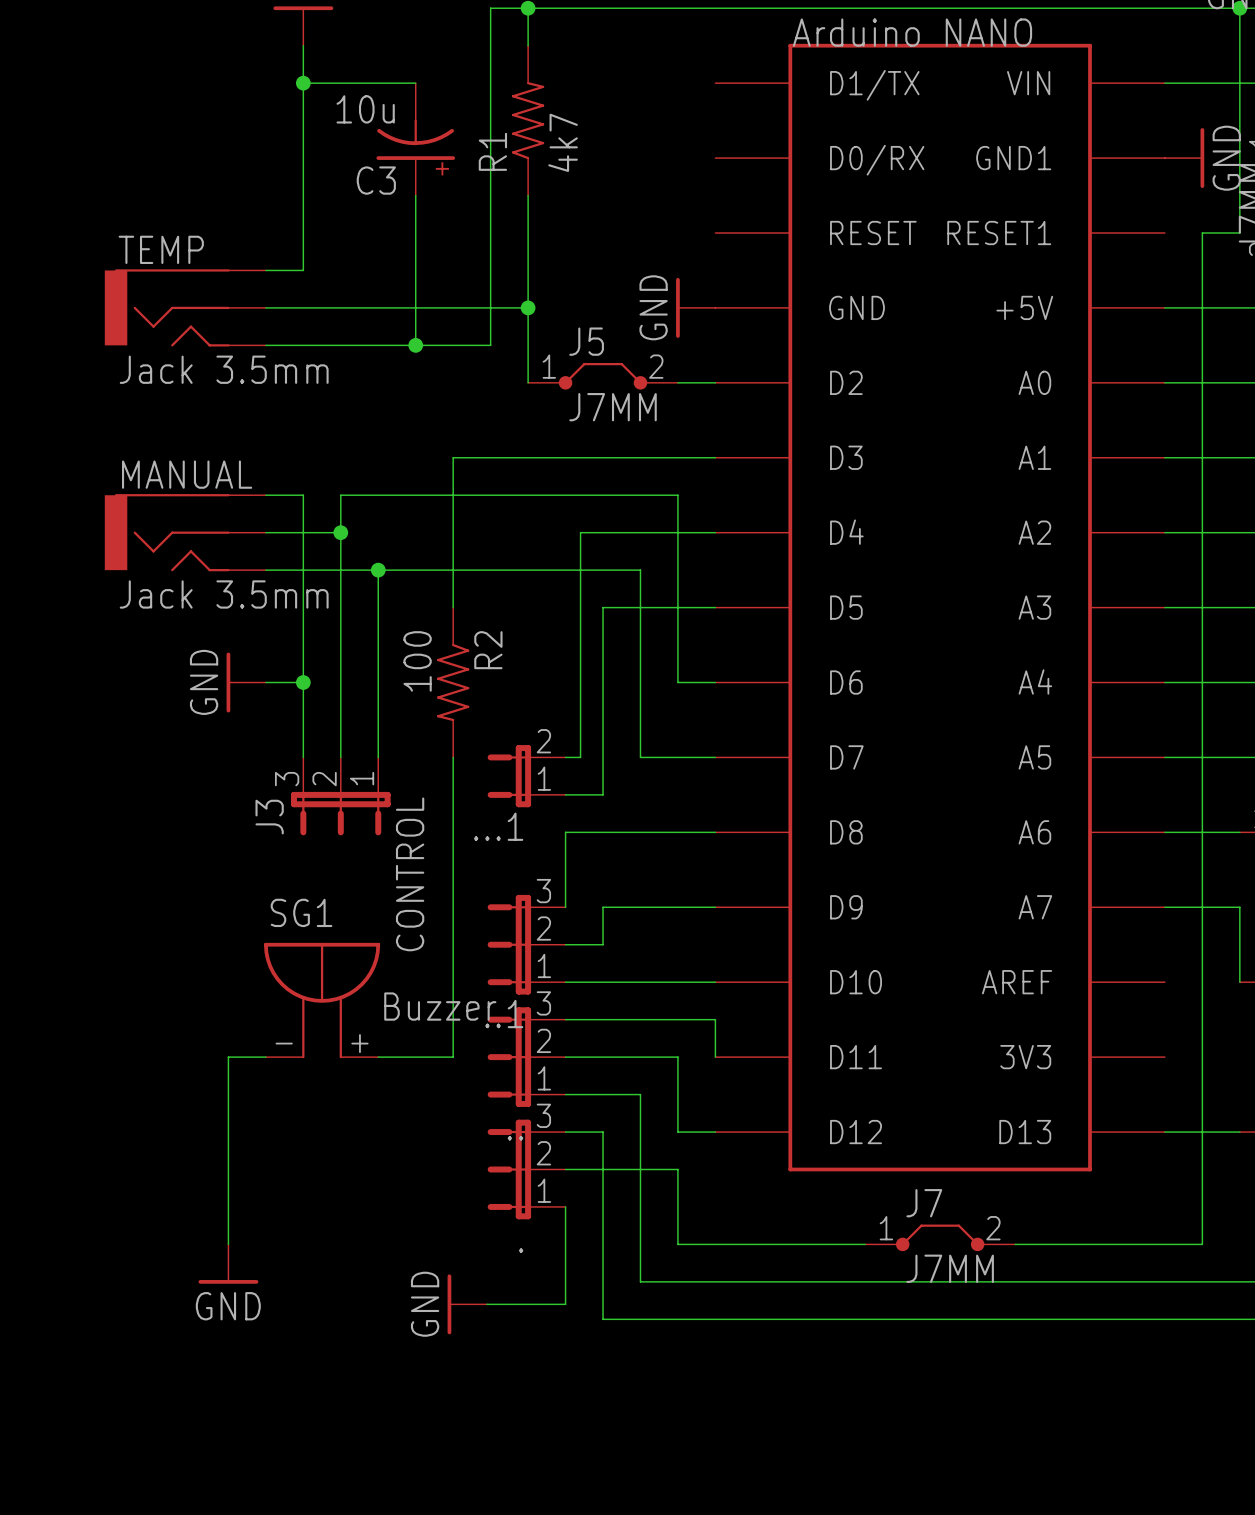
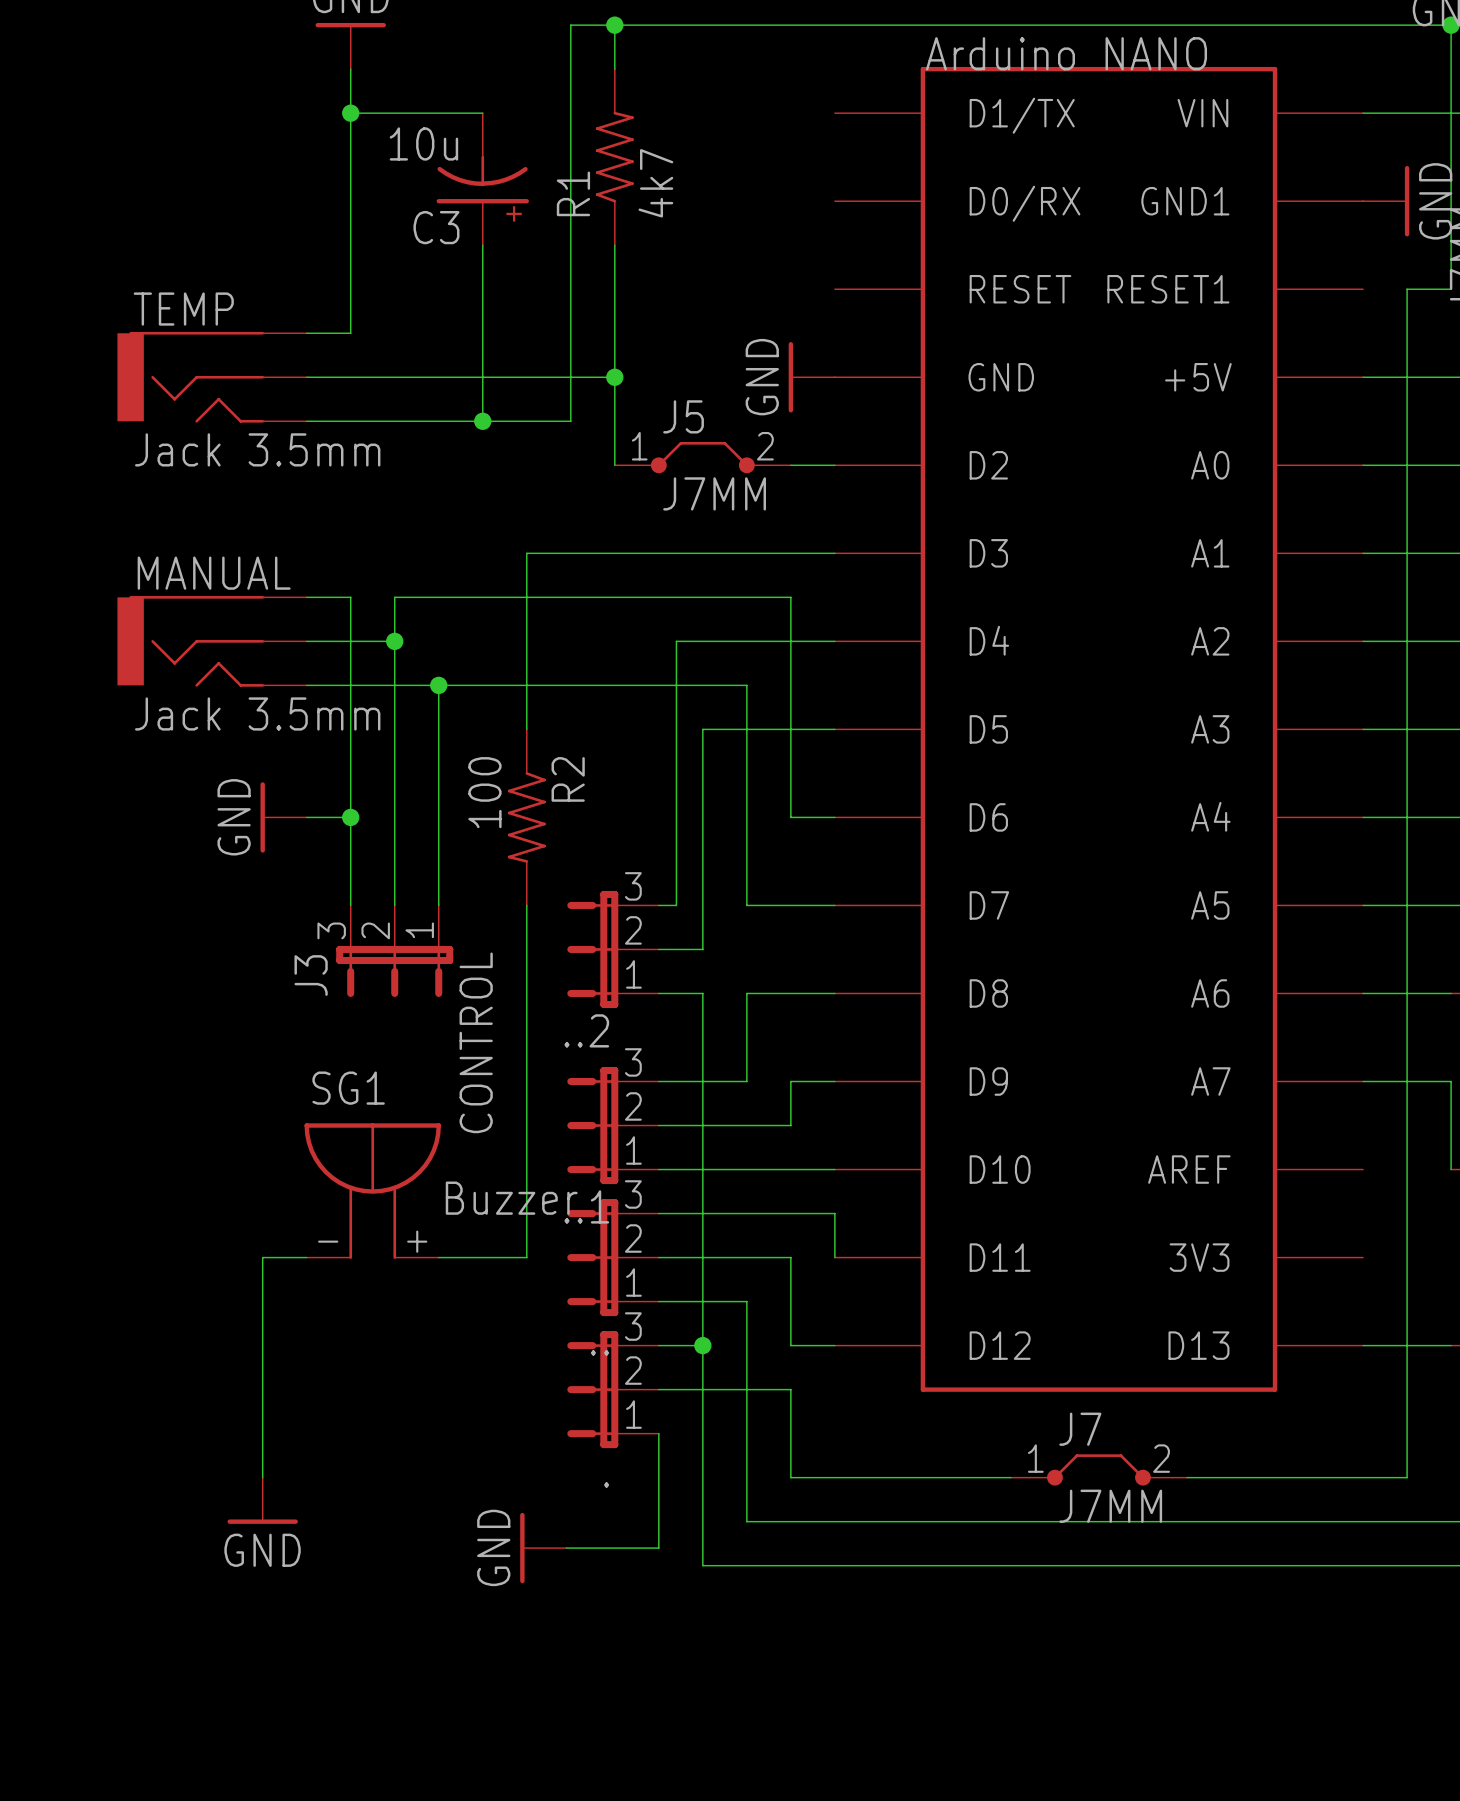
...1: (526, 776) -> none
..2: none -> (613, 949)
wire: (565, 832) (565, 907) -> (702, 993) (702, 1081) (658, 1081)
wire: (603, 832) (640, 832) -> (746, 1081) (746, 993)
wire: (640, 907) (677, 907) -> (702, 1345) (702, 1125) (790, 1125) (790, 1081)
junction: none -> (702, 1345)

